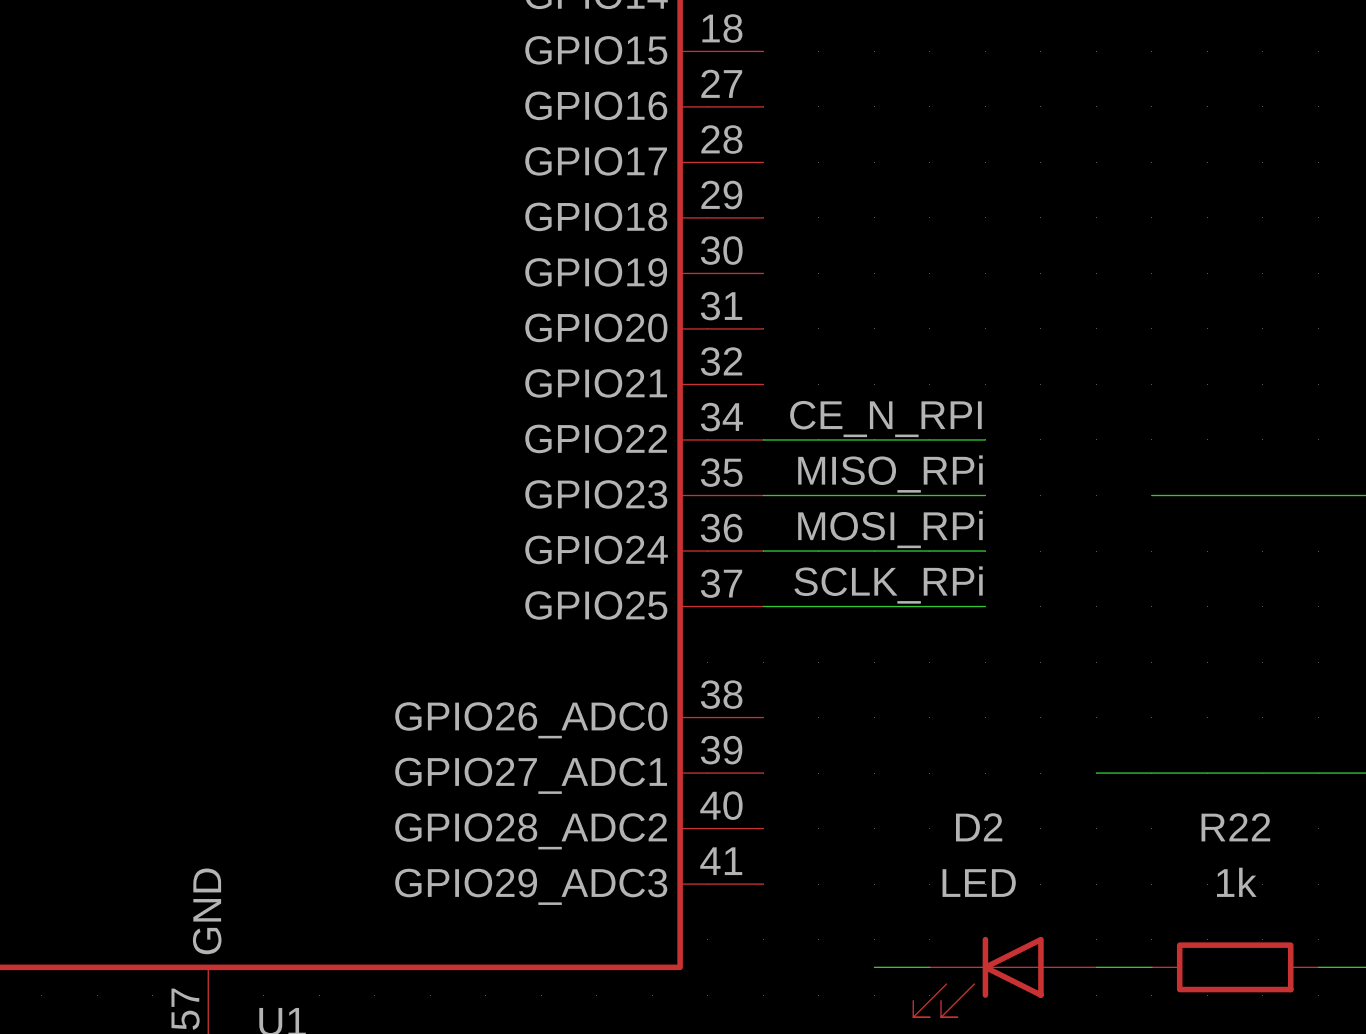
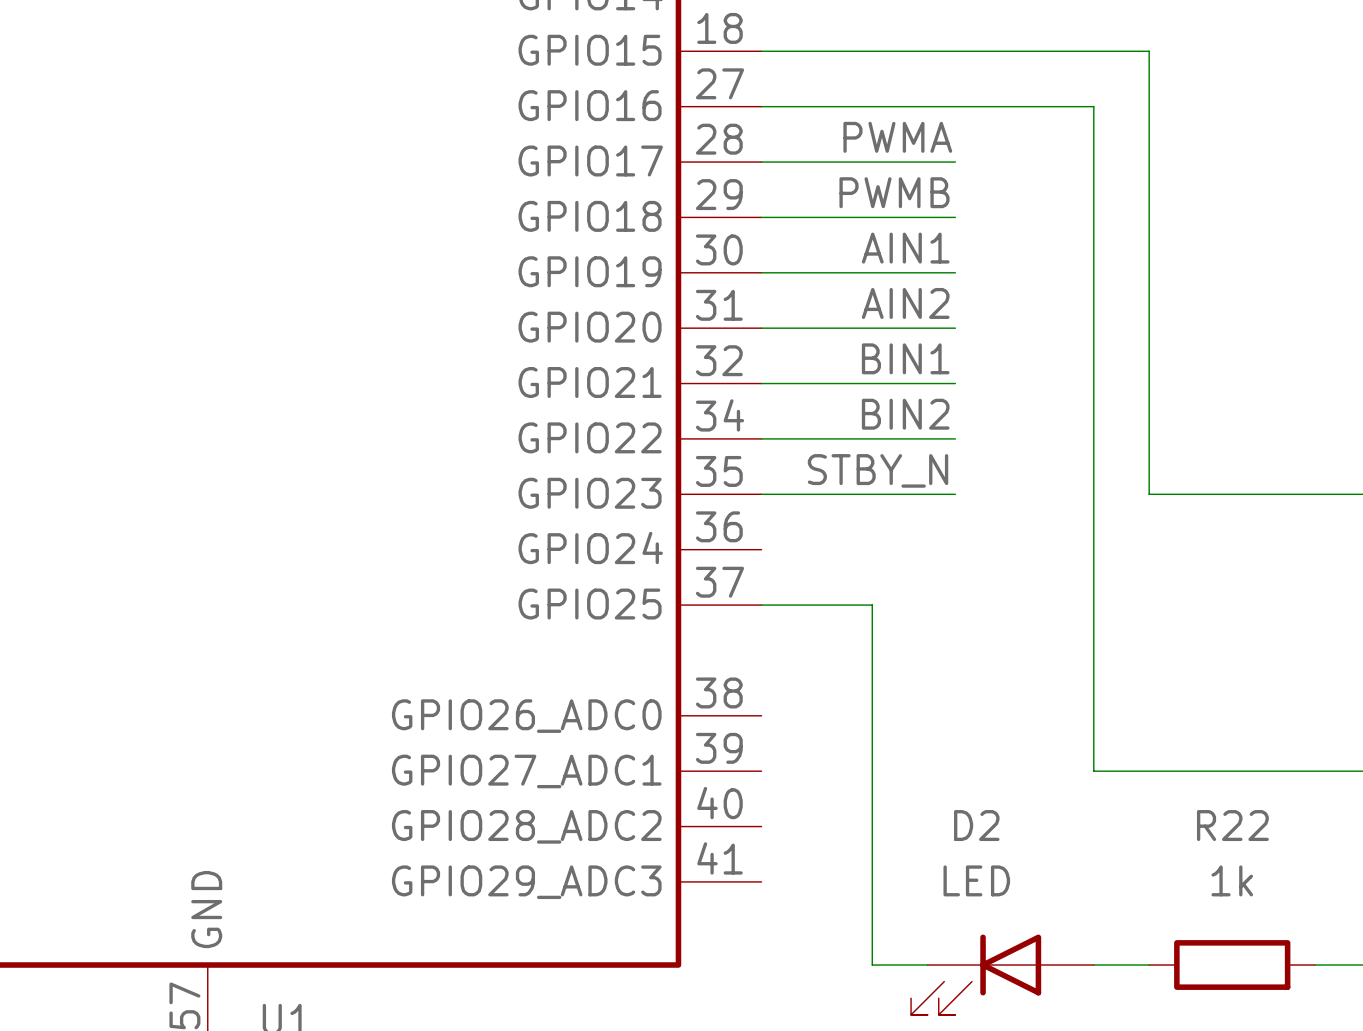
wire: none -> (761, 51) (1149, 51) (1149, 494)
wire: none -> (761, 106) (1093, 106) (1093, 771)
label: none -> PWMA (897, 137)
wire: none -> (761, 162) (955, 162)
label: none -> PWMB (894, 192)
wire: none -> (761, 217) (955, 217)
label: none -> AIN1 (905, 248)
wire: none -> (761, 272) (955, 272)
label: none -> AIN2 (905, 303)
wire: none -> (761, 328) (955, 328)
label: none -> BIN1 (905, 358)
wire: none -> (761, 383) (955, 383)
label: none -> BIN2 (905, 414)
label: CE_N_RPI (885, 419) -> none
wire: (957, 439) (985, 439) -> none
label: none -> STBY_N (878, 470)
label: MISO_RPi (890, 474) -> none
wire: (957, 495) (985, 495) -> none
label: MOSI_RPi (890, 529) -> none
wire: (763, 551) (985, 551) -> none
label: SCLK_RPi (888, 585) -> none
wire: (874, 606) (985, 606) -> (872, 605) (872, 965)

